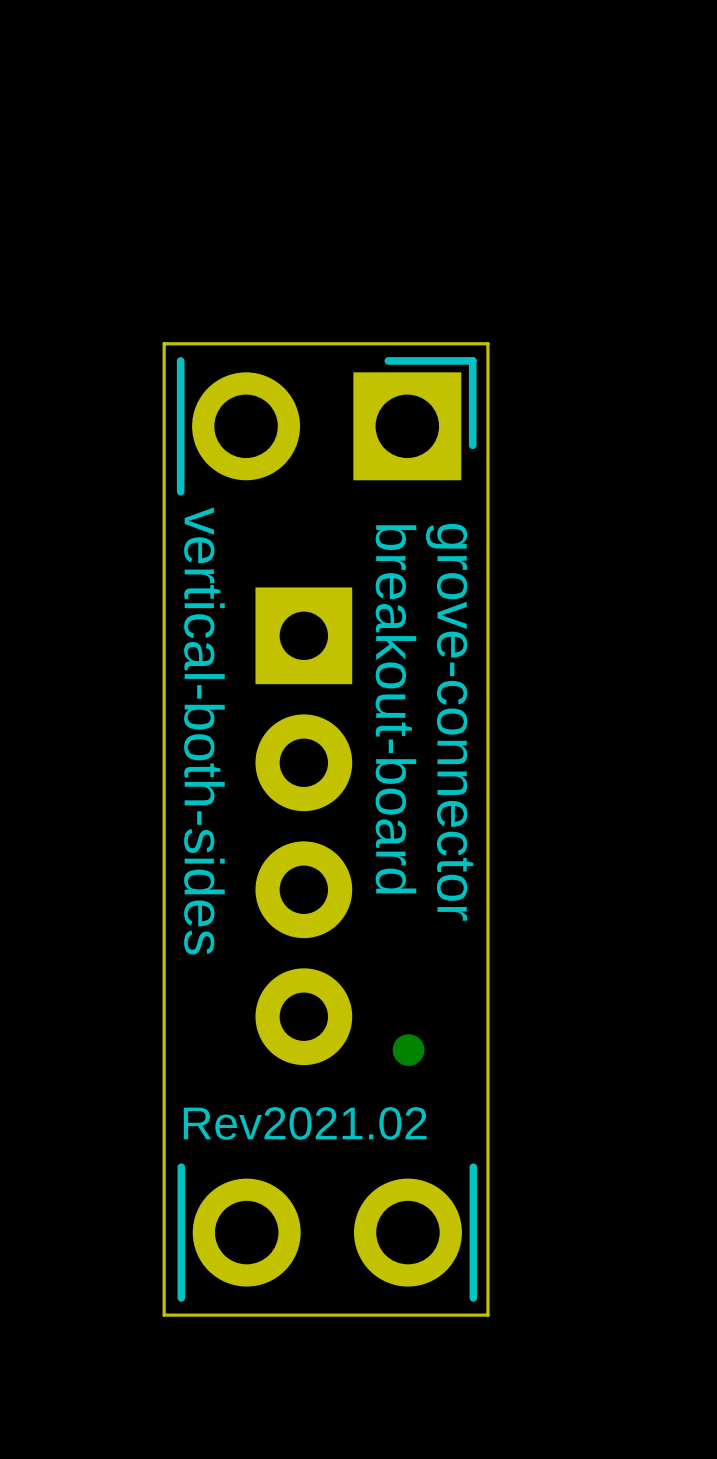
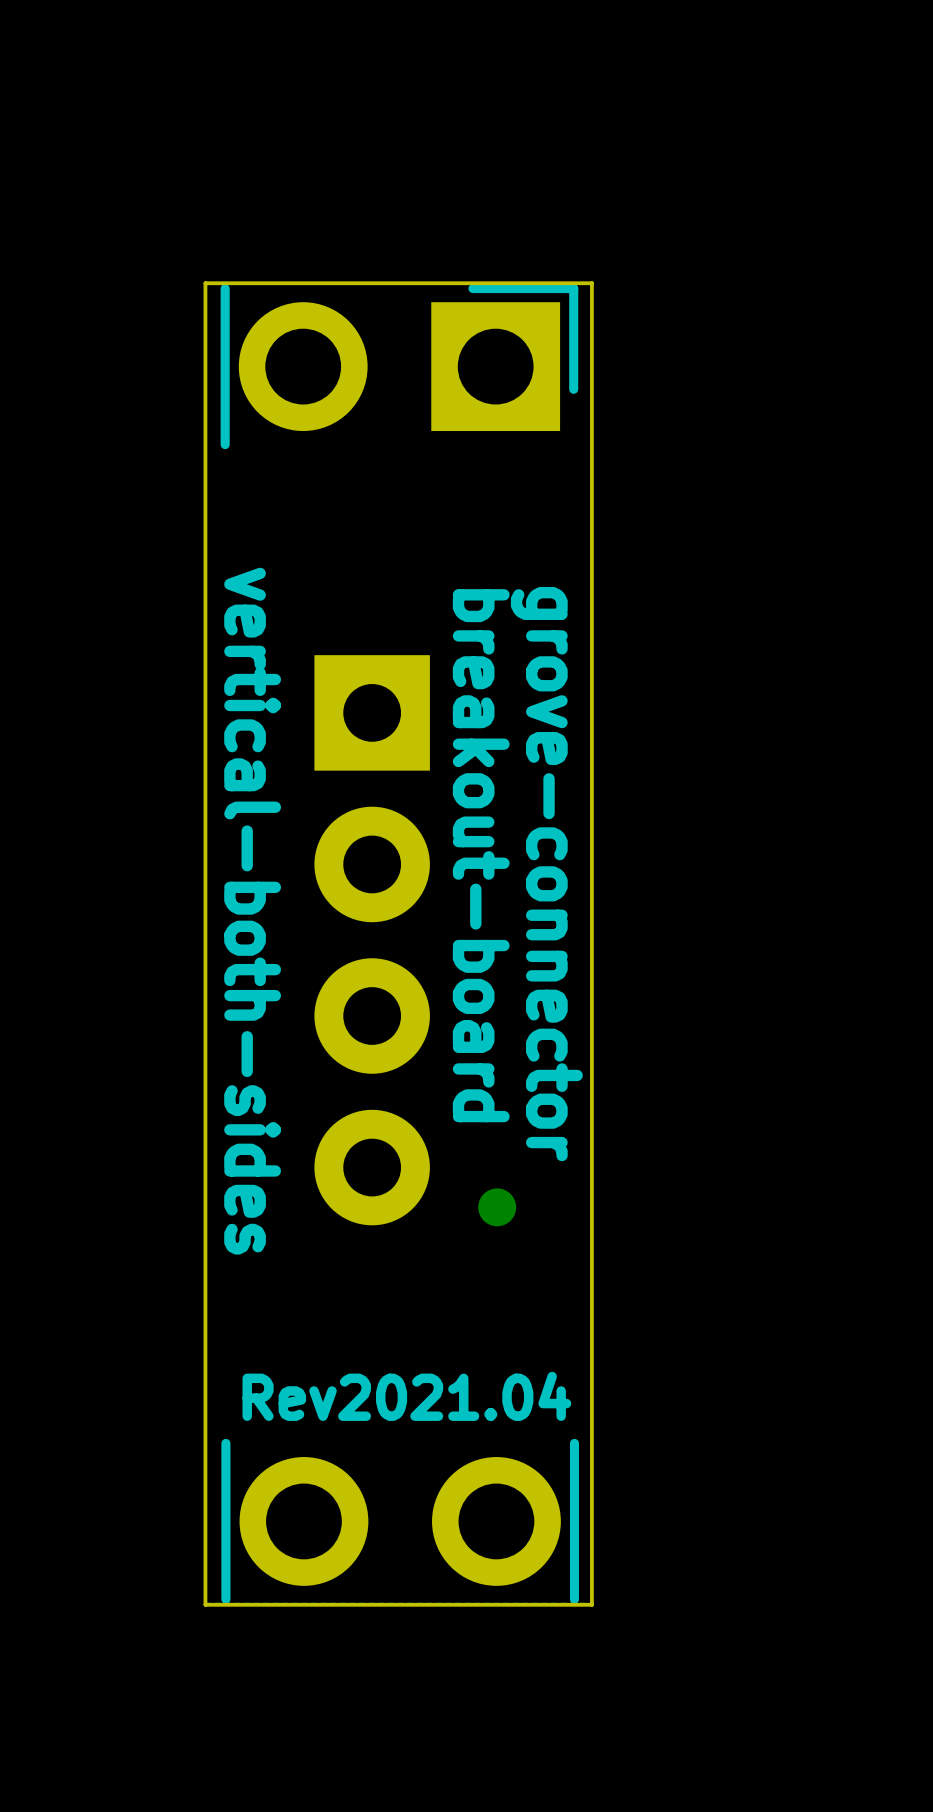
board edge: (487, 343) (164, 343) -> (591, 364) (591, 283) (205, 283) (205, 364)
part position: (326, 426) -> (399, 366)
text: Rev2021.02 (305, 1123) -> none
text: none -> Rev2021.04 (406, 1396)
part position: (327, 1232) -> (400, 1521)
board edge: (487, 1315) (164, 1315) -> (591, 1523) (591, 1604) (205, 1604) (205, 1523)

